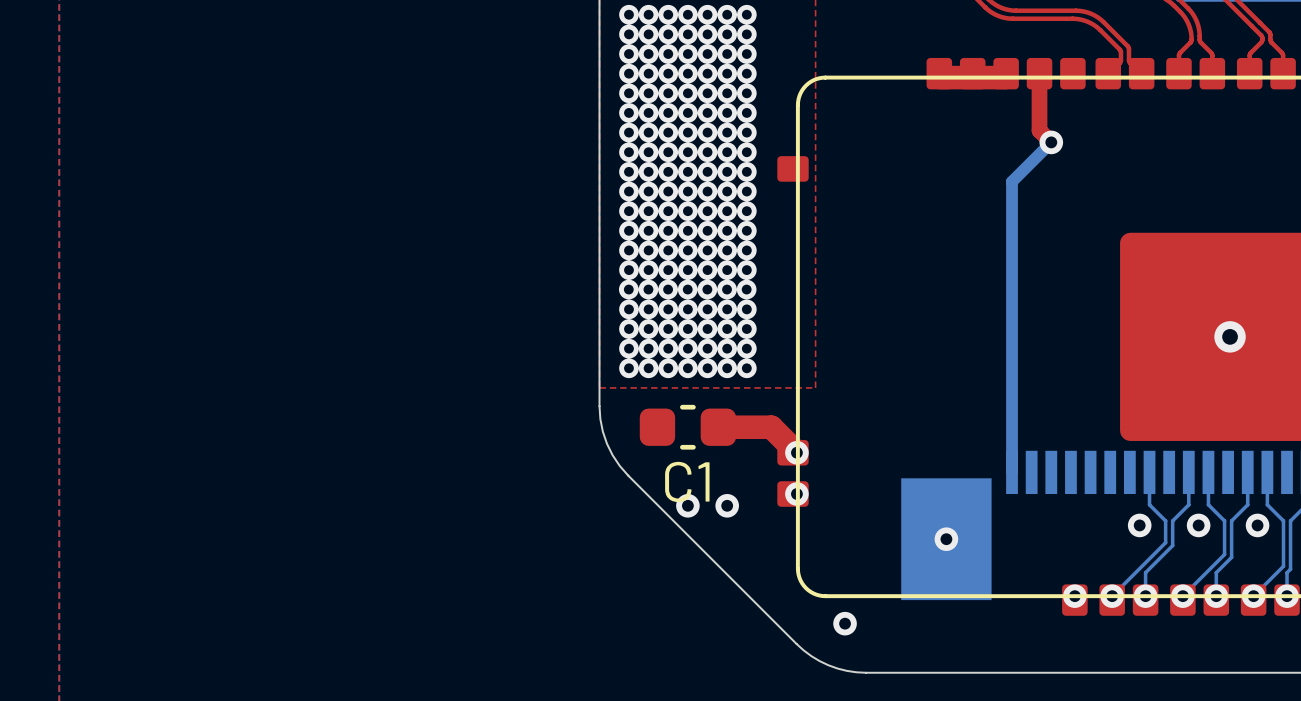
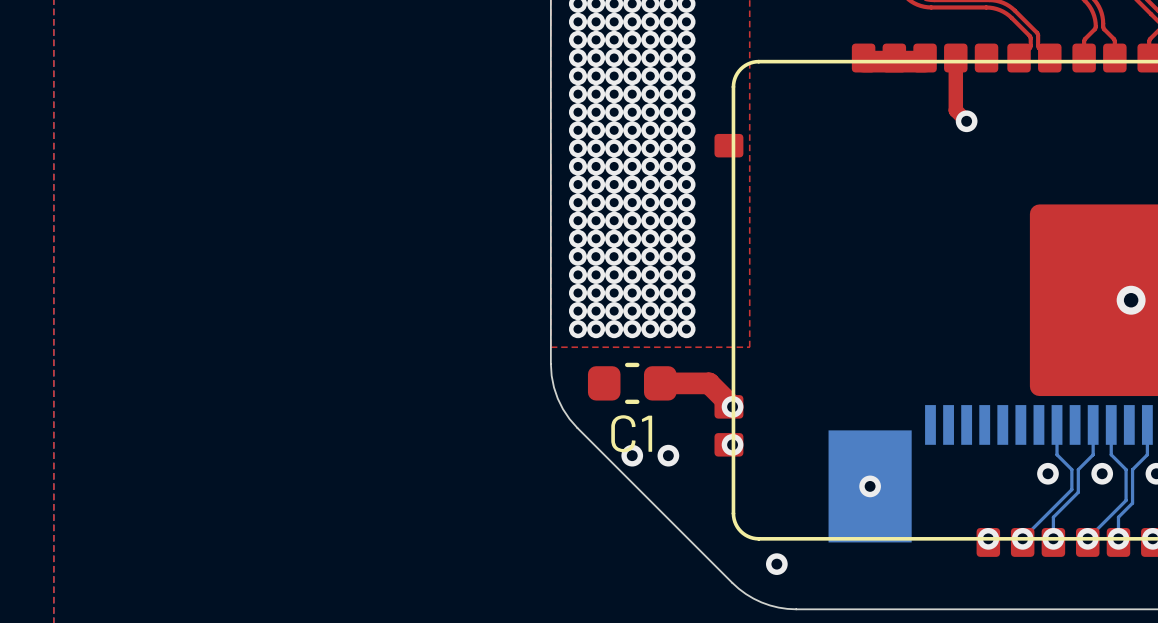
bottom track: (1051, 142) (1012, 181) (1012, 472) -> none

